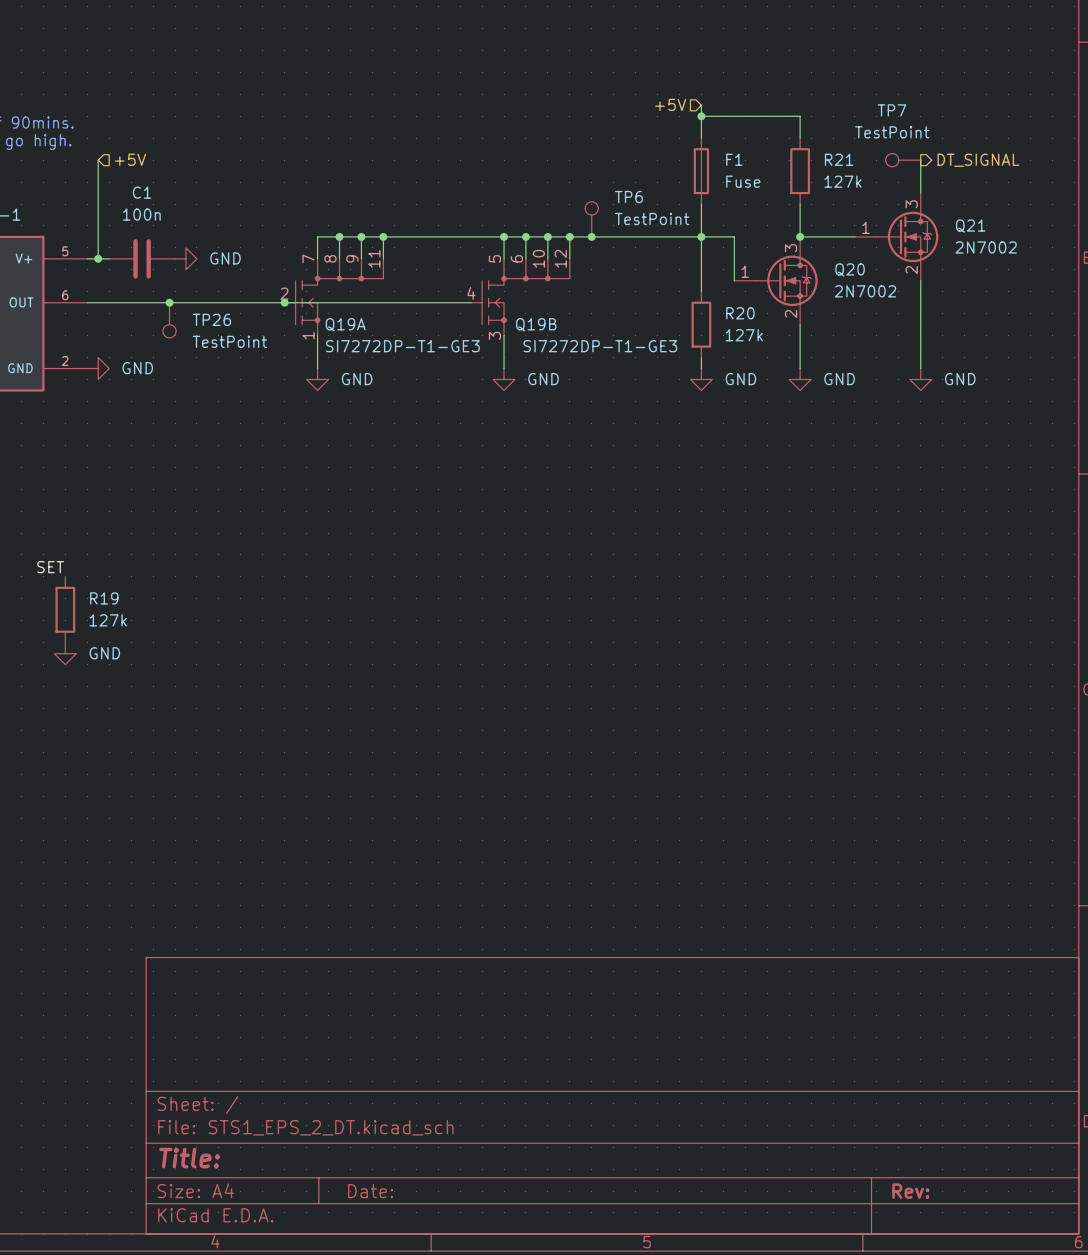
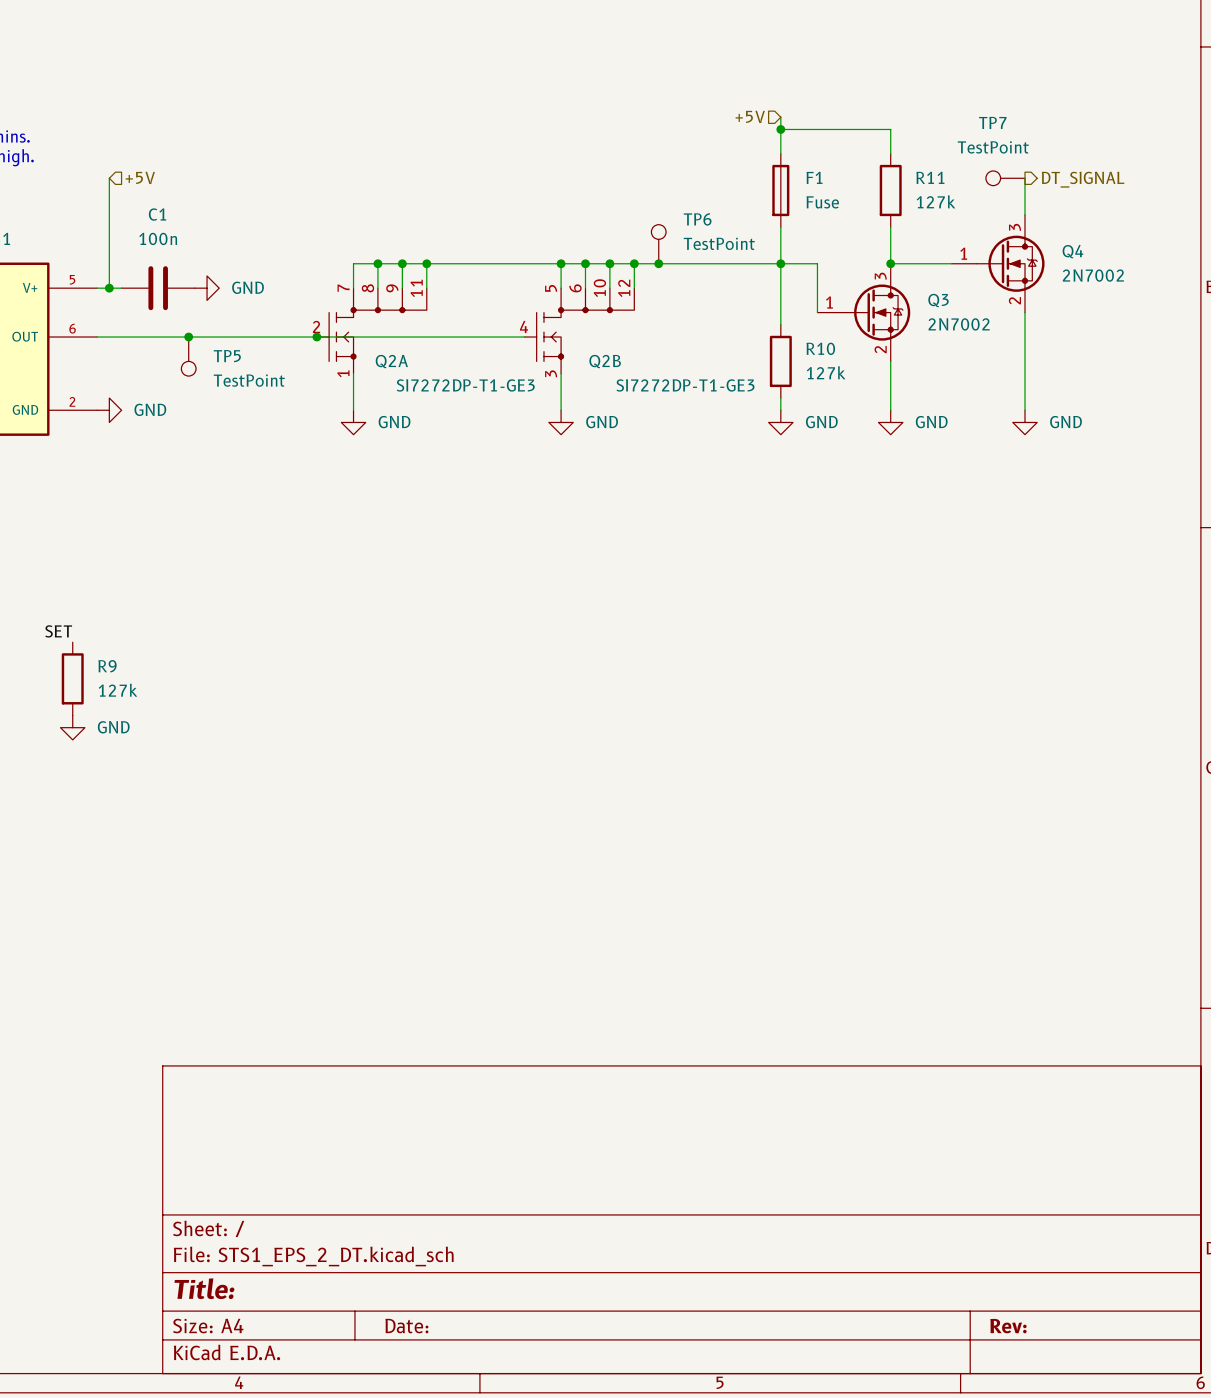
R21 name: R21 (839, 159) -> R11 (930, 177)
Q21 name: Q21 (970, 226) -> Q4 (1072, 251)
Q20 name: Q20 (850, 269) -> Q3 (938, 300)
R20 name: R20 (740, 313) -> R10 (820, 348)
TP26 name: TP26 (211, 319) -> TP5 (227, 356)
Q19A name: Q19A (345, 324) -> Q2A (391, 361)
Q19B name: Q19B (536, 324) -> Q2B (605, 361)
R19 name: R19 (104, 598) -> R9 (107, 666)

